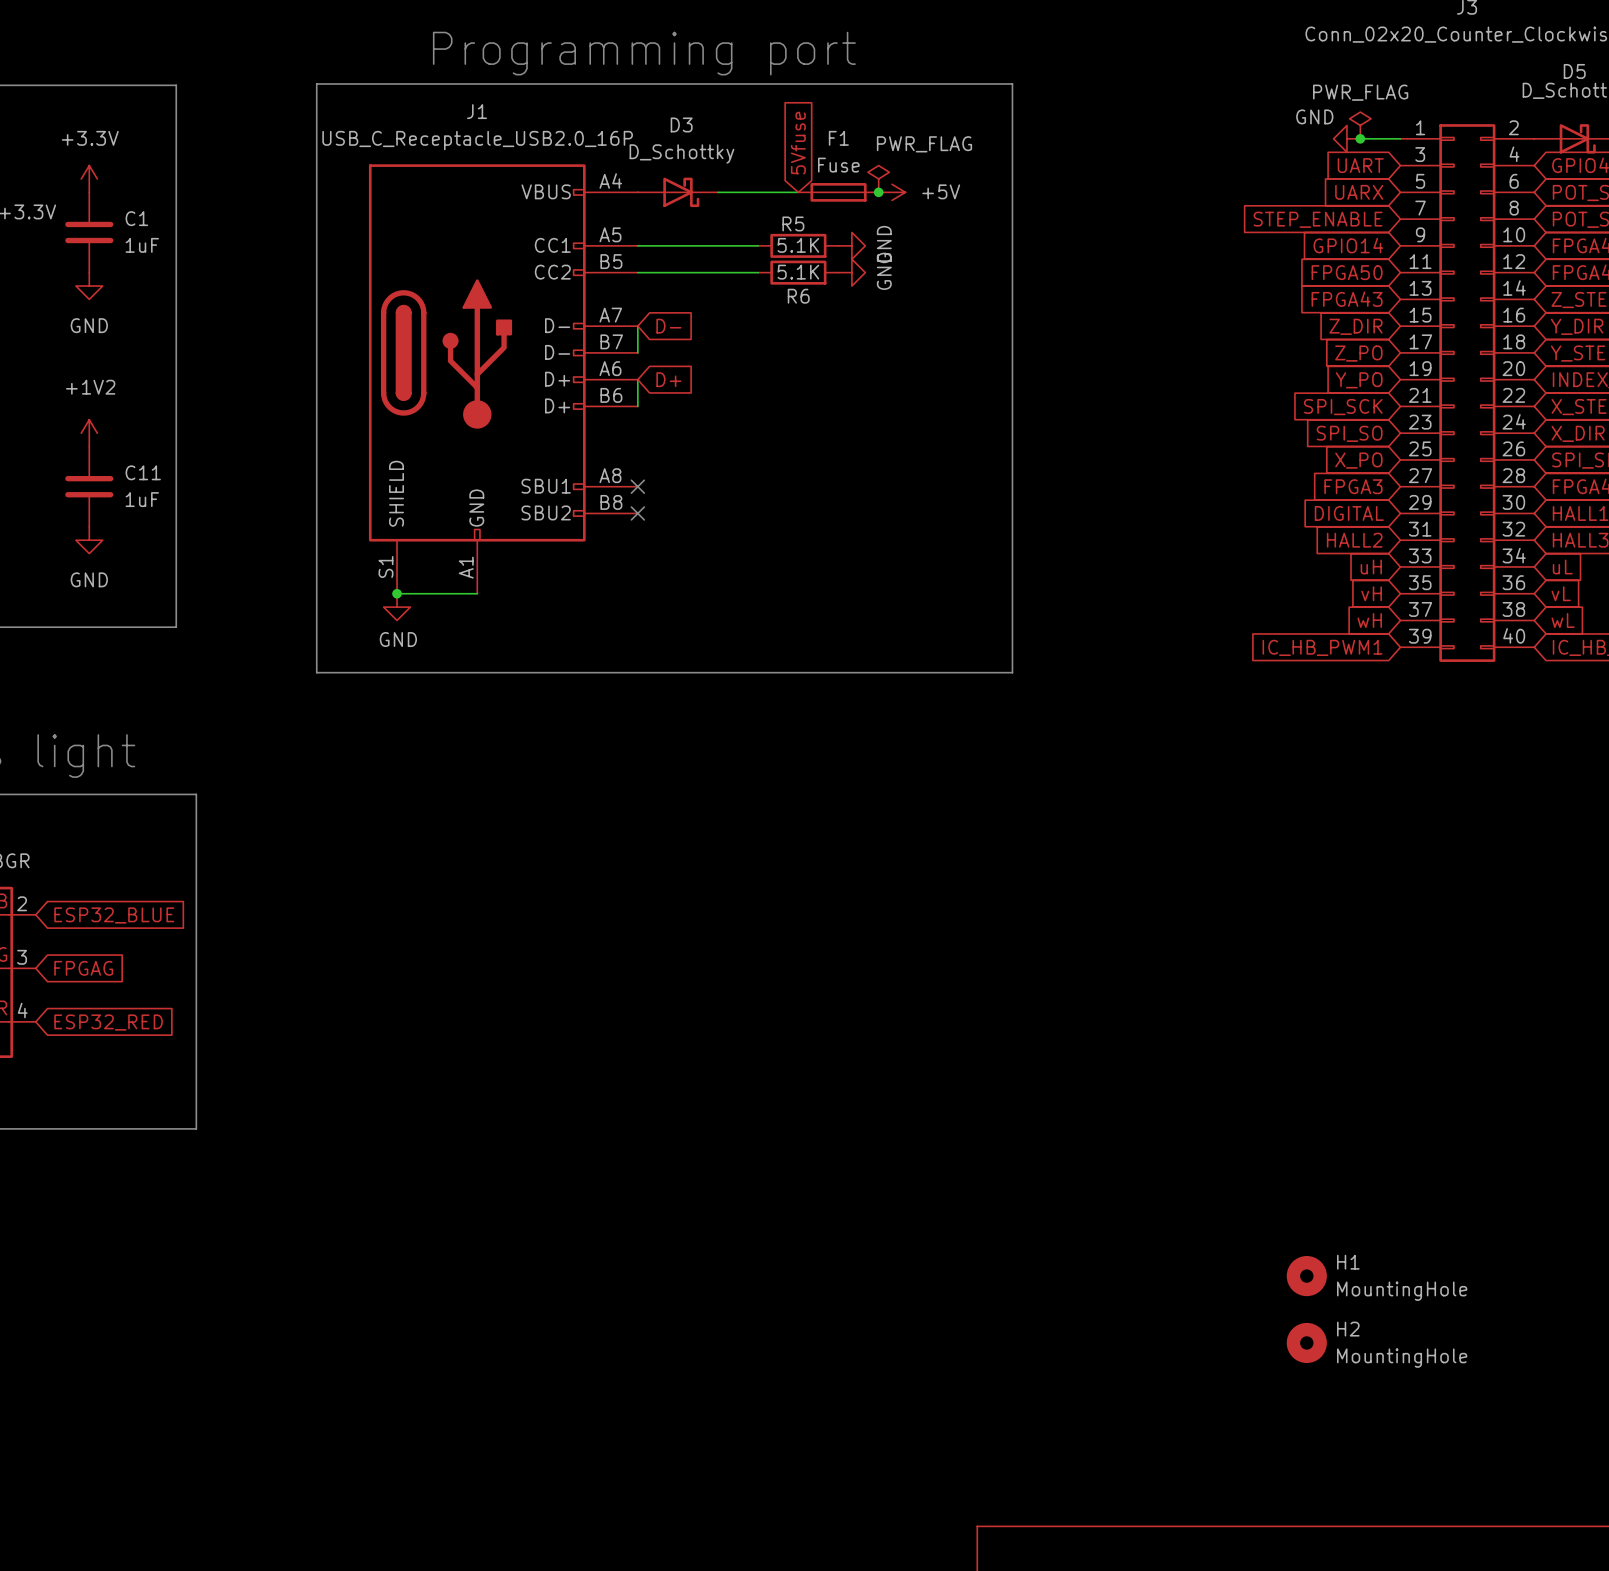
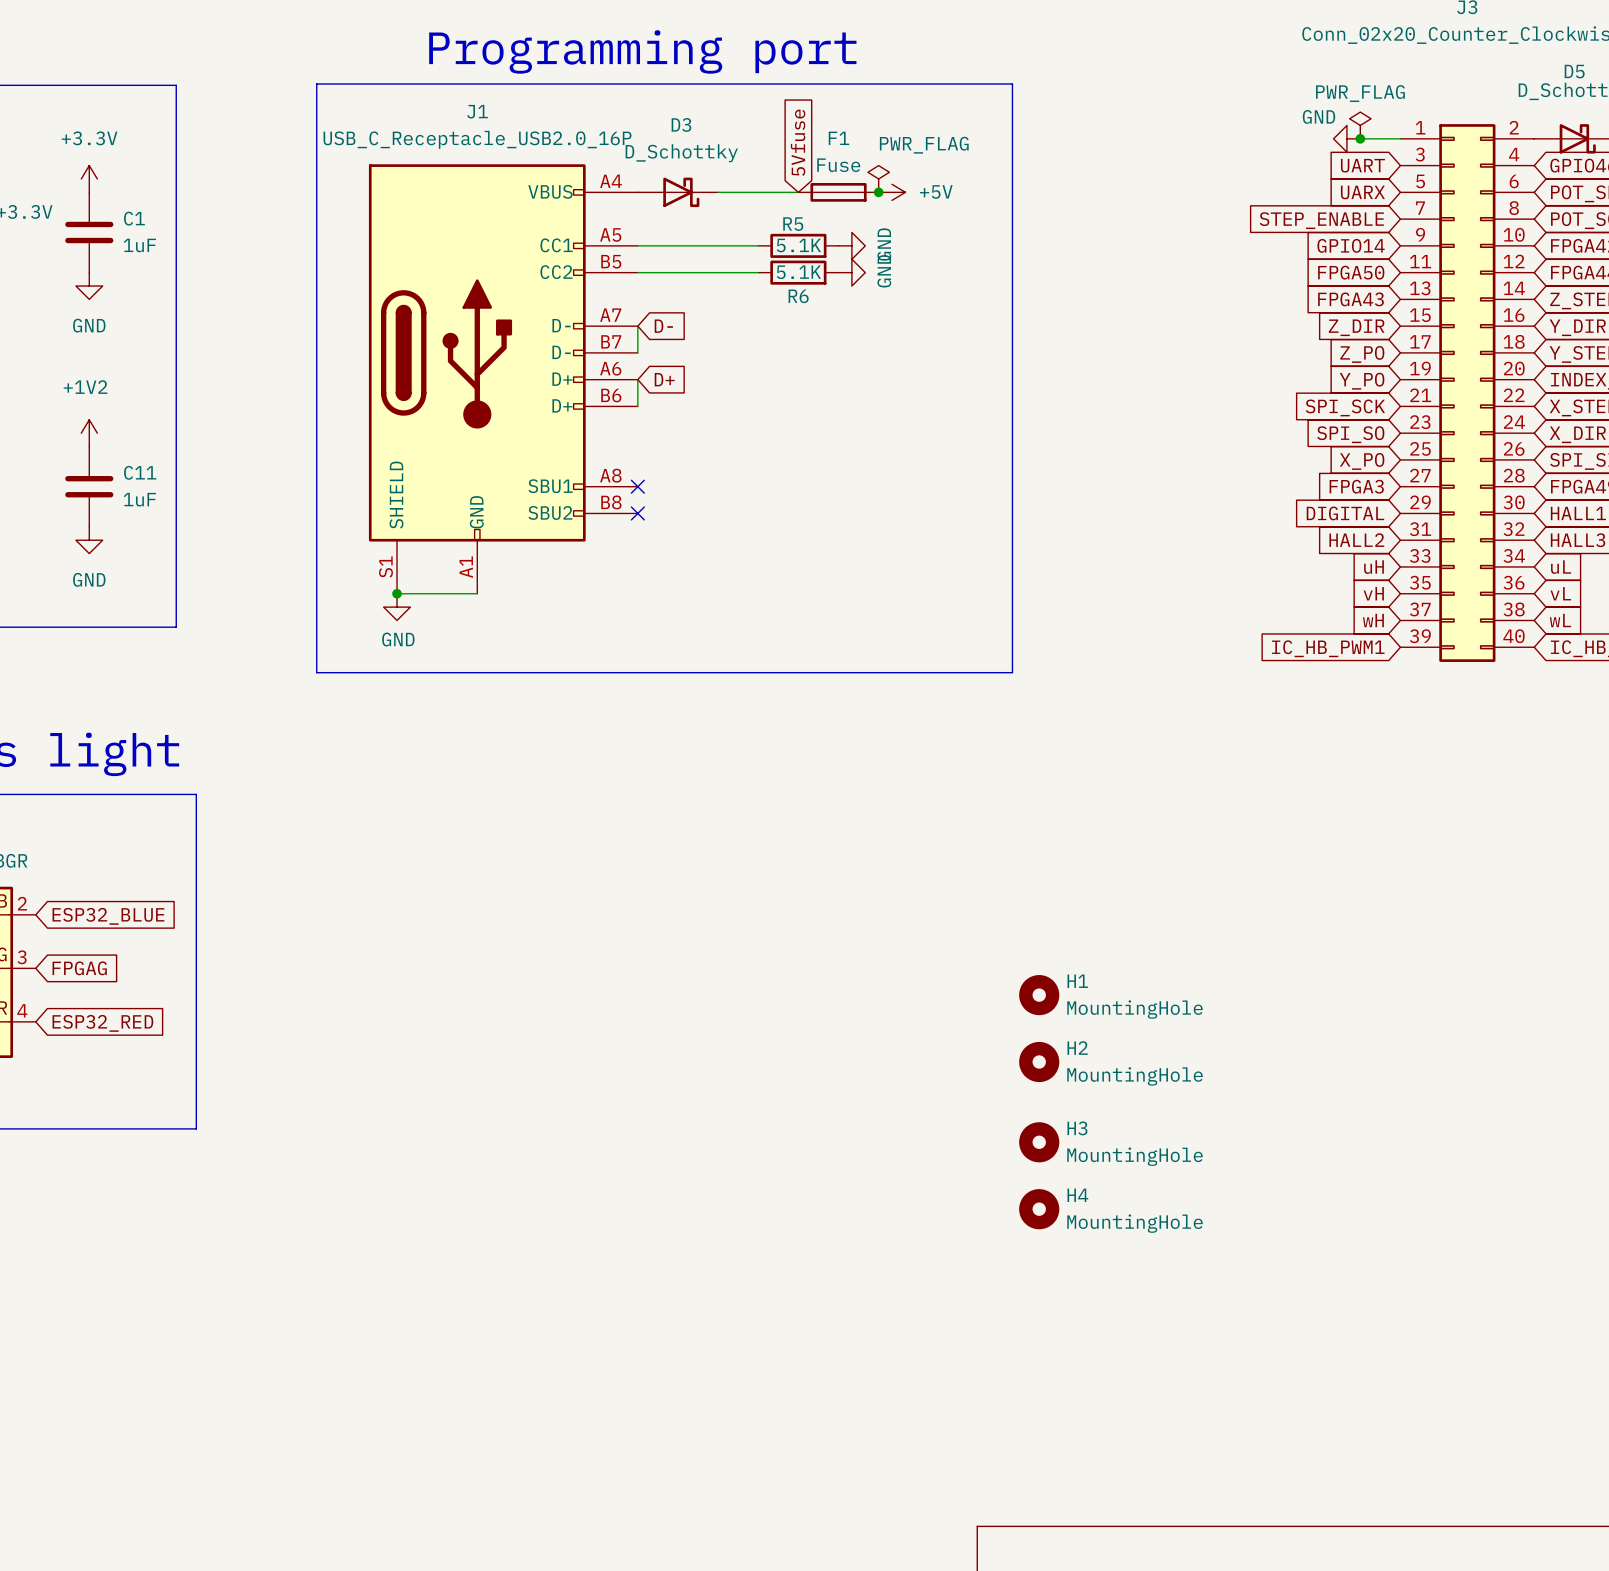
H3: none -> MountingHole (1039, 1142)
H4: none -> MountingHole (1039, 1209)
H1 position: (1306, 1276) -> (1039, 995)
H2 position: (1306, 1342) -> (1039, 1062)

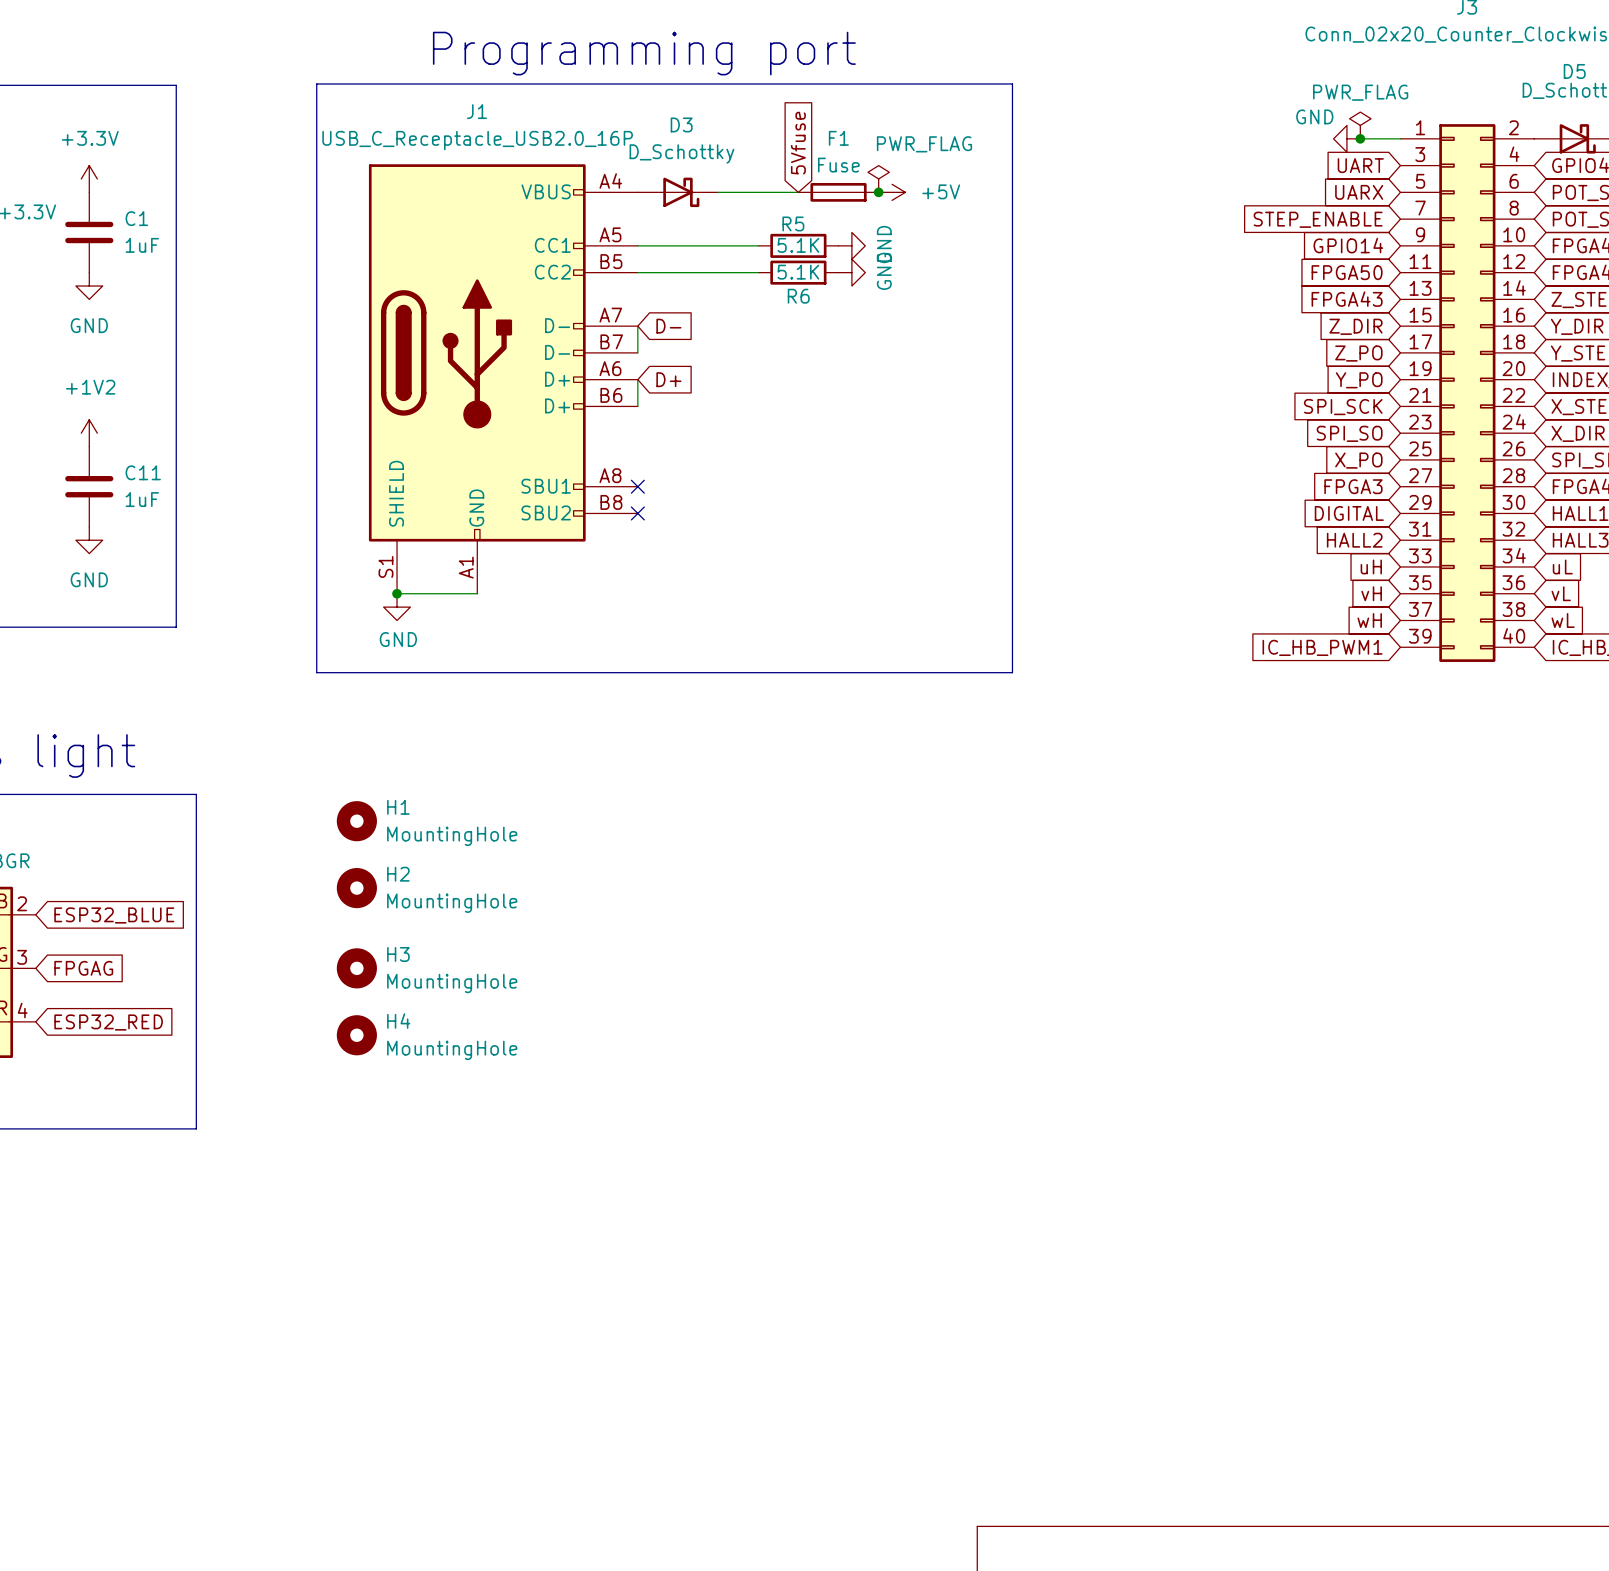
H1 position: (1039, 995) -> (356, 821)
H2 position: (1039, 1062) -> (356, 888)
H3 position: (1039, 1142) -> (356, 968)
H4 position: (1039, 1209) -> (356, 1035)

